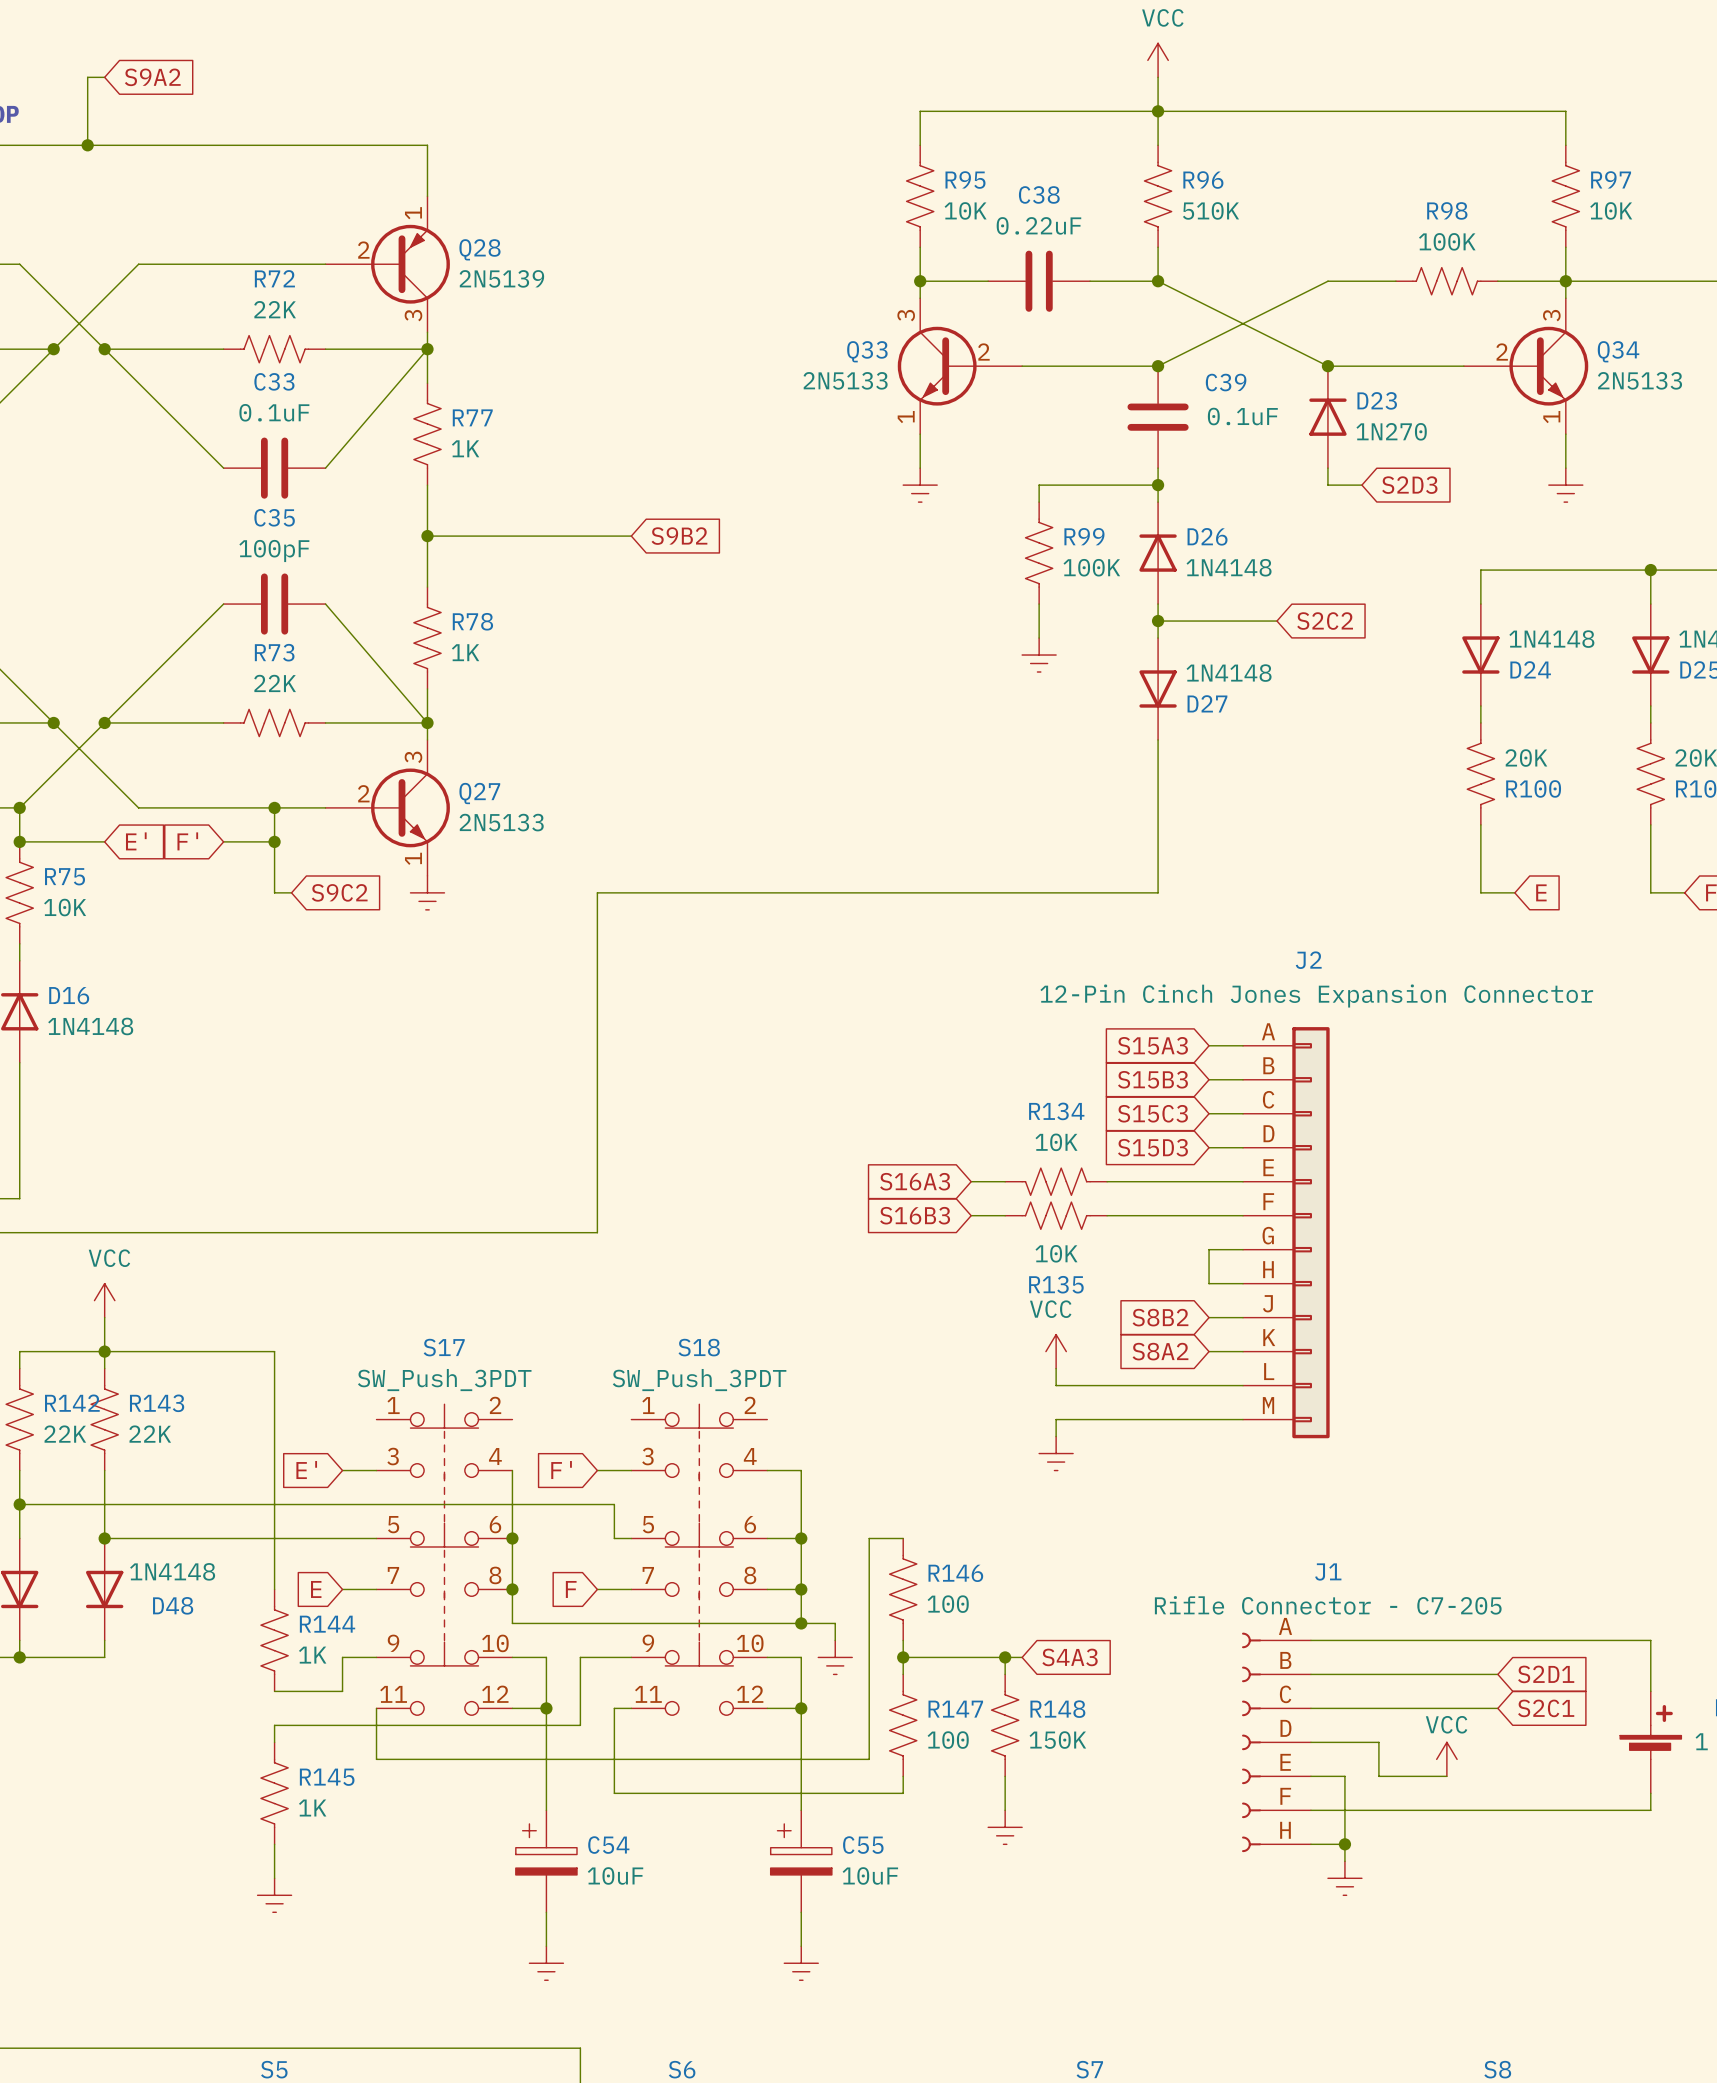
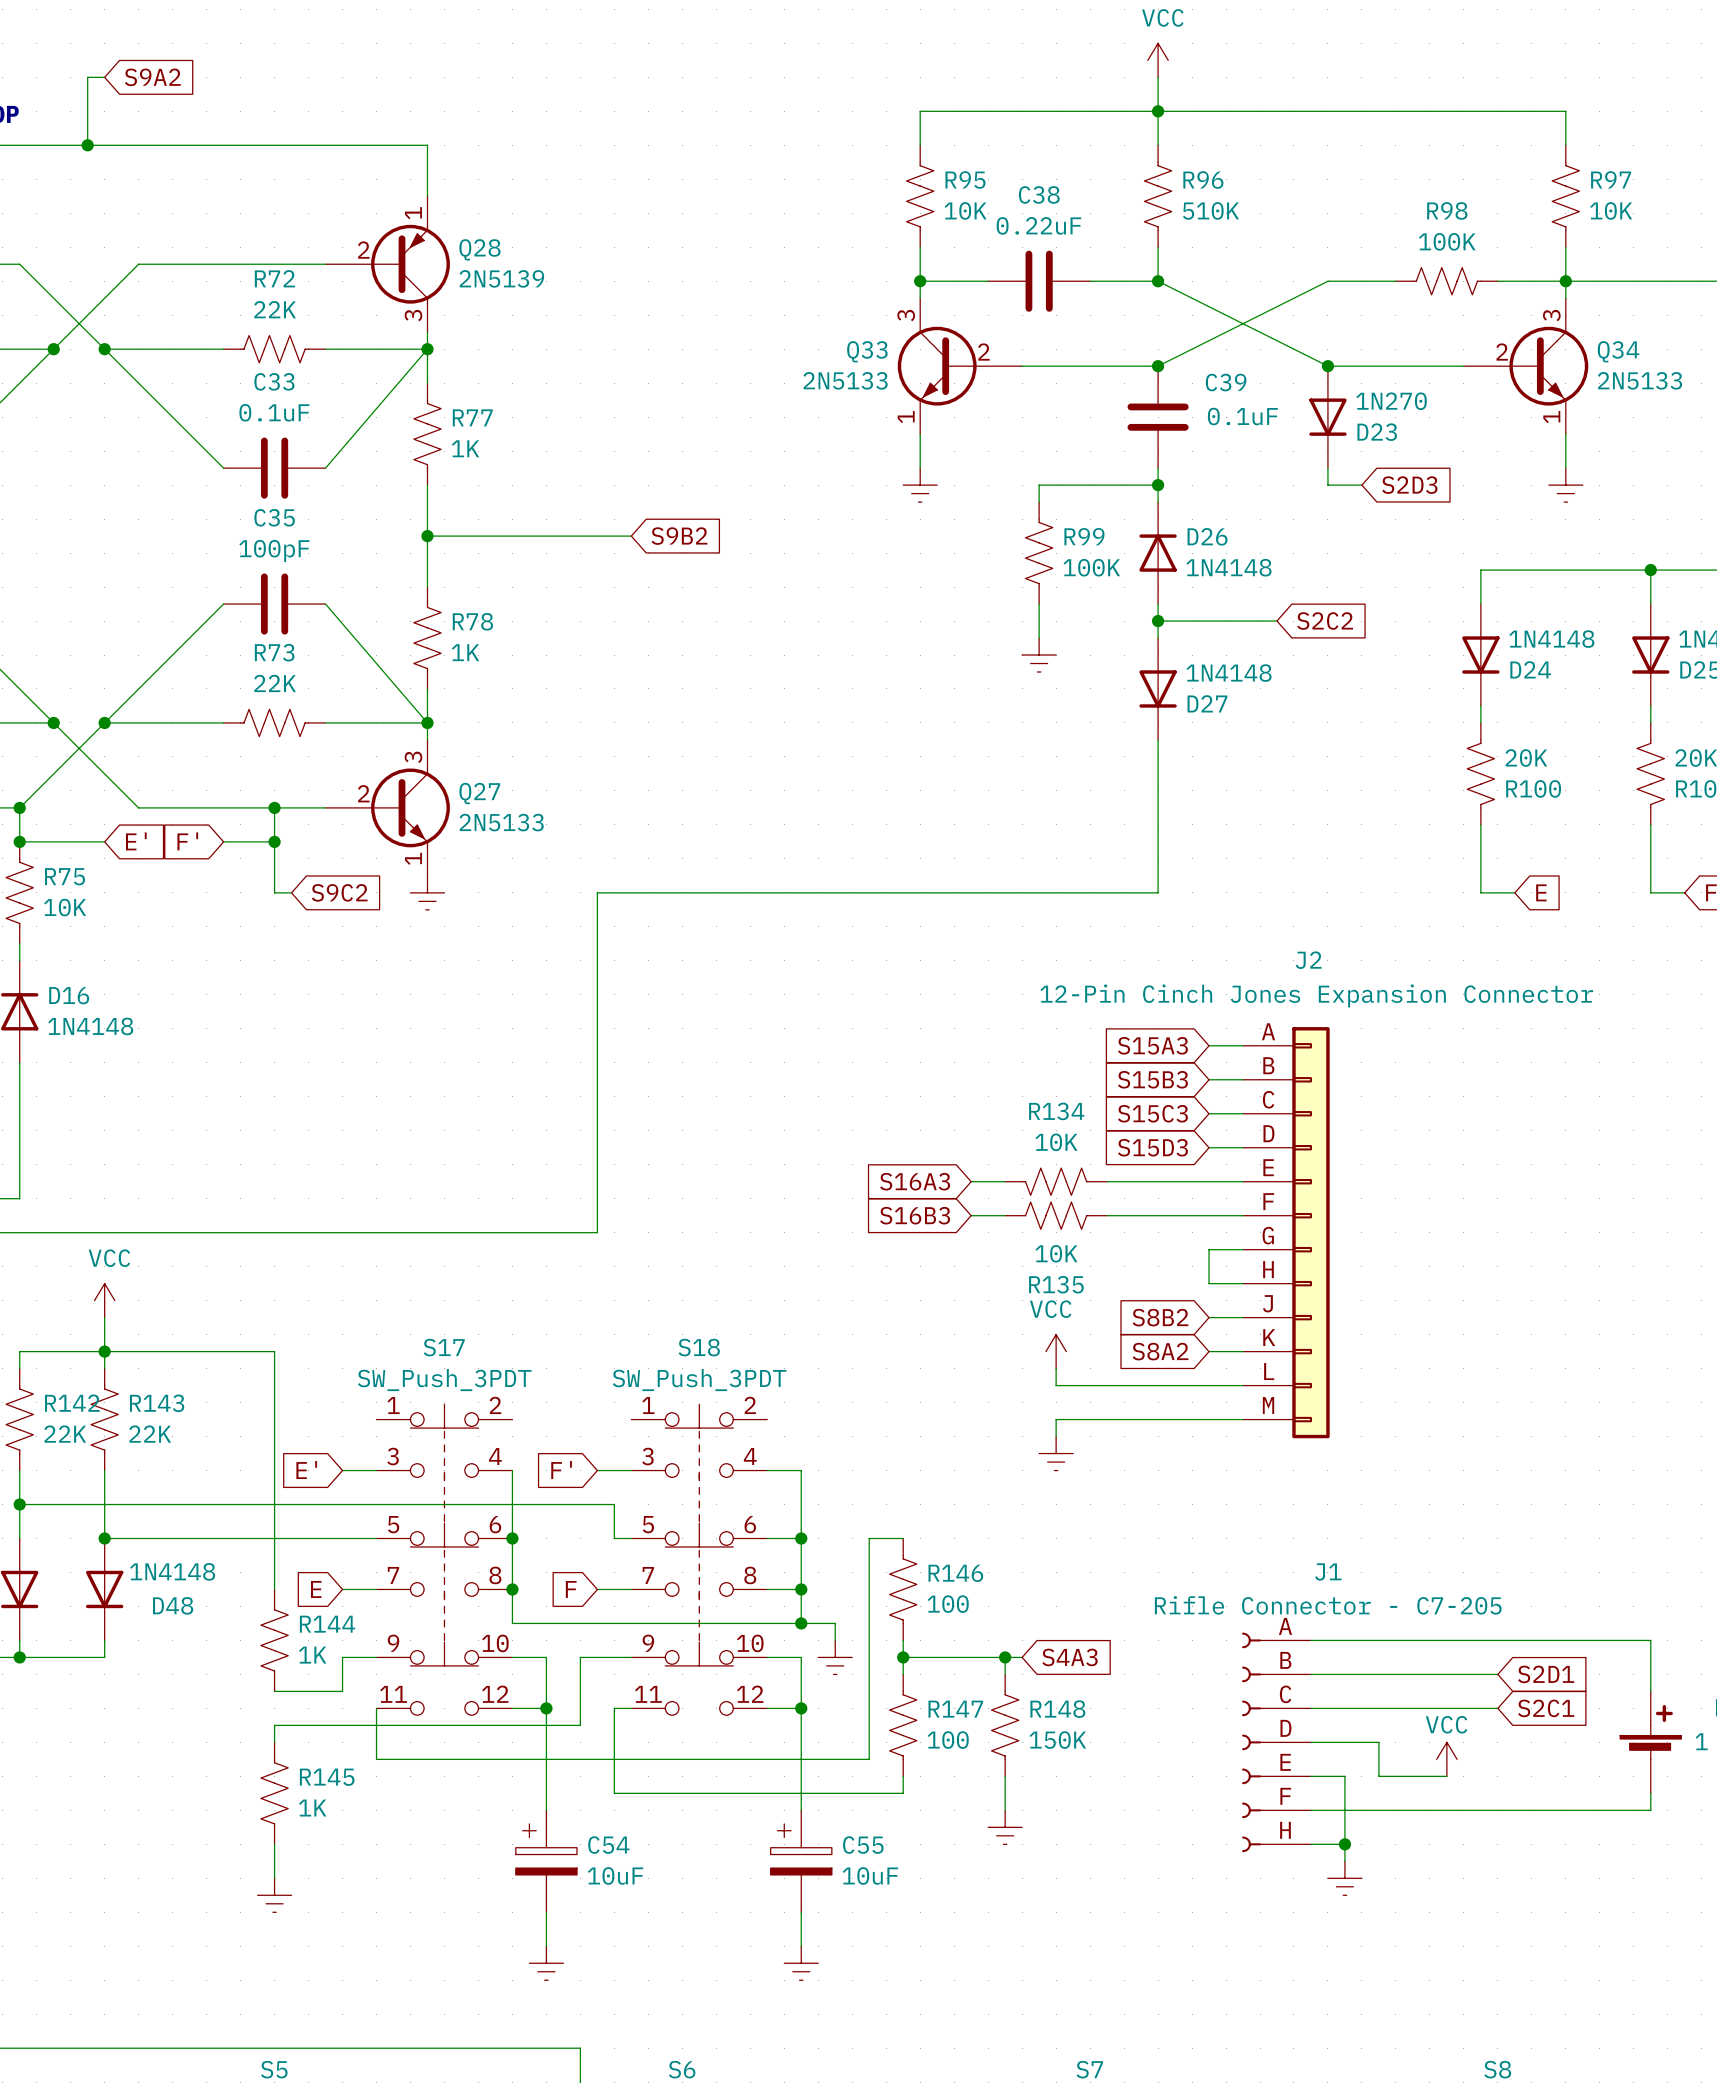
D23 name position: D23 (1377, 400) -> D23 (1377, 432)
D23 rotation: 0° (1327, 417) -> 180° (1327, 417)
D23 value position: 1N270 (1391, 431) -> 1N270 (1391, 401)

